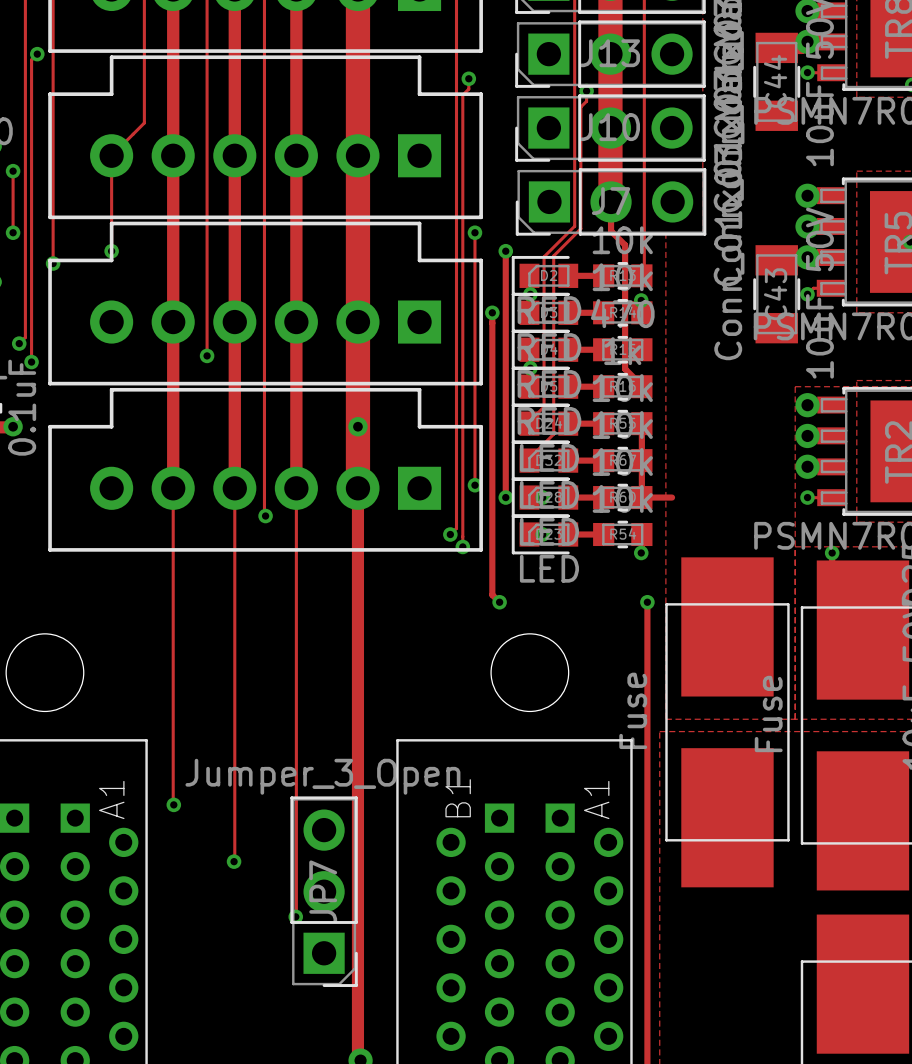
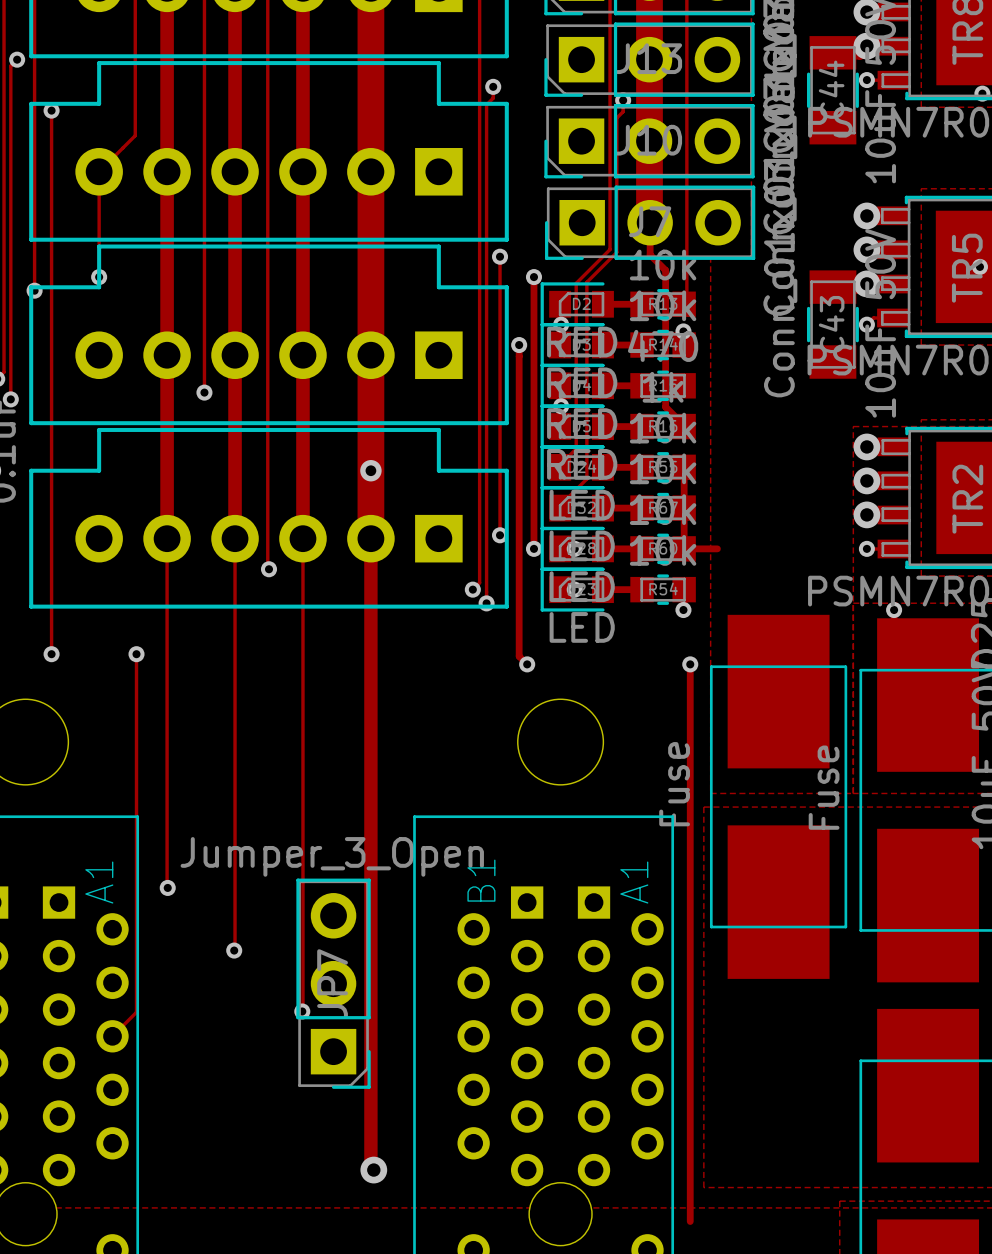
track: none -> (51, 110) (51, 654)
via: none -> (51, 110)
via: none -> (51, 654)
track: none -> (136, 654) (136, 1012) (112, 1036)
via: none -> (136, 654)

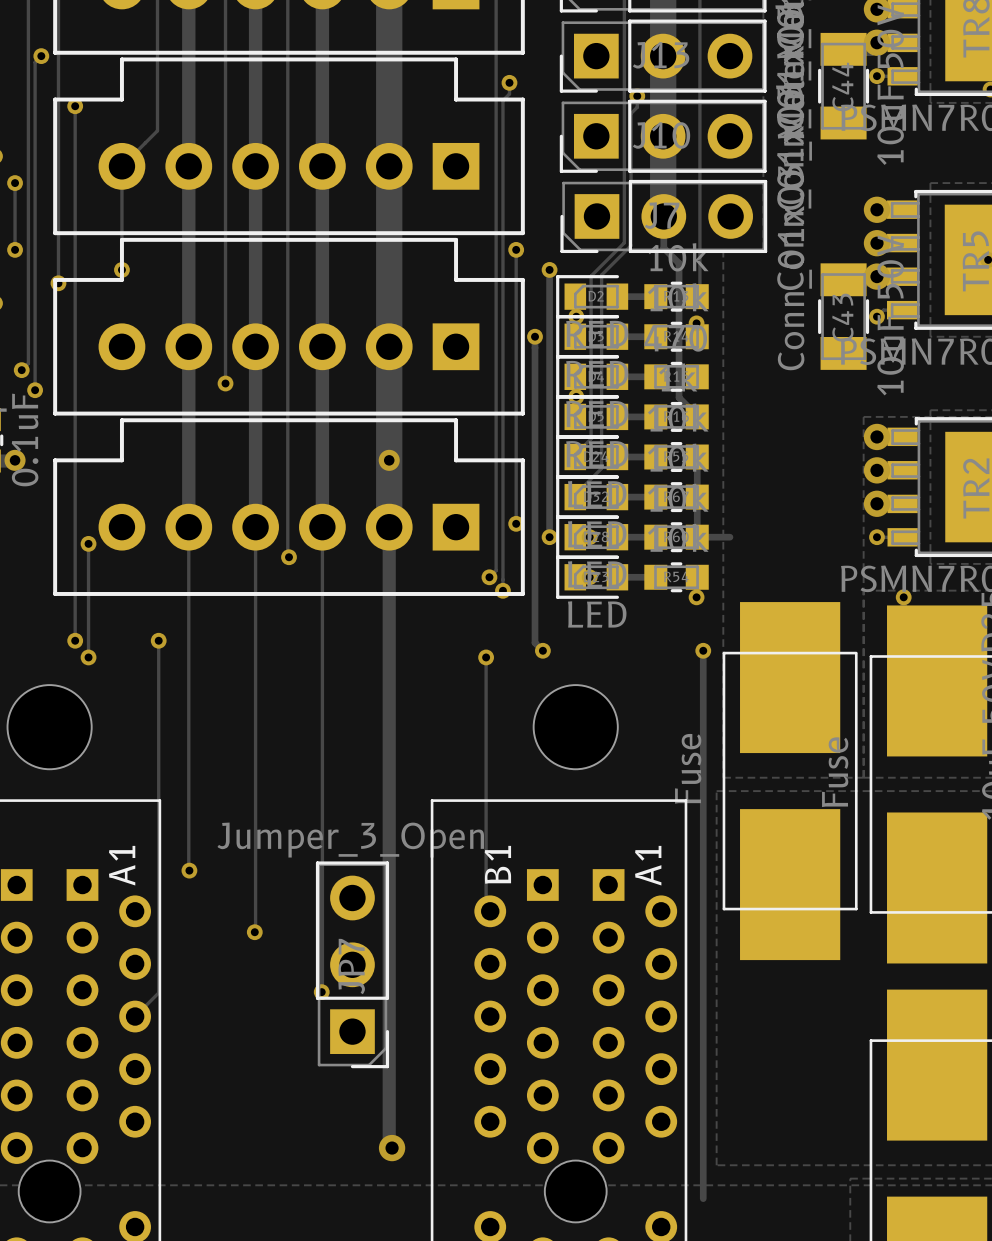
track: none -> (88, 543) (88, 657)
via: none -> (88, 543)
via: none -> (88, 657)
track: none -> (486, 657) (486, 907) (490, 911)
via: none -> (486, 657)

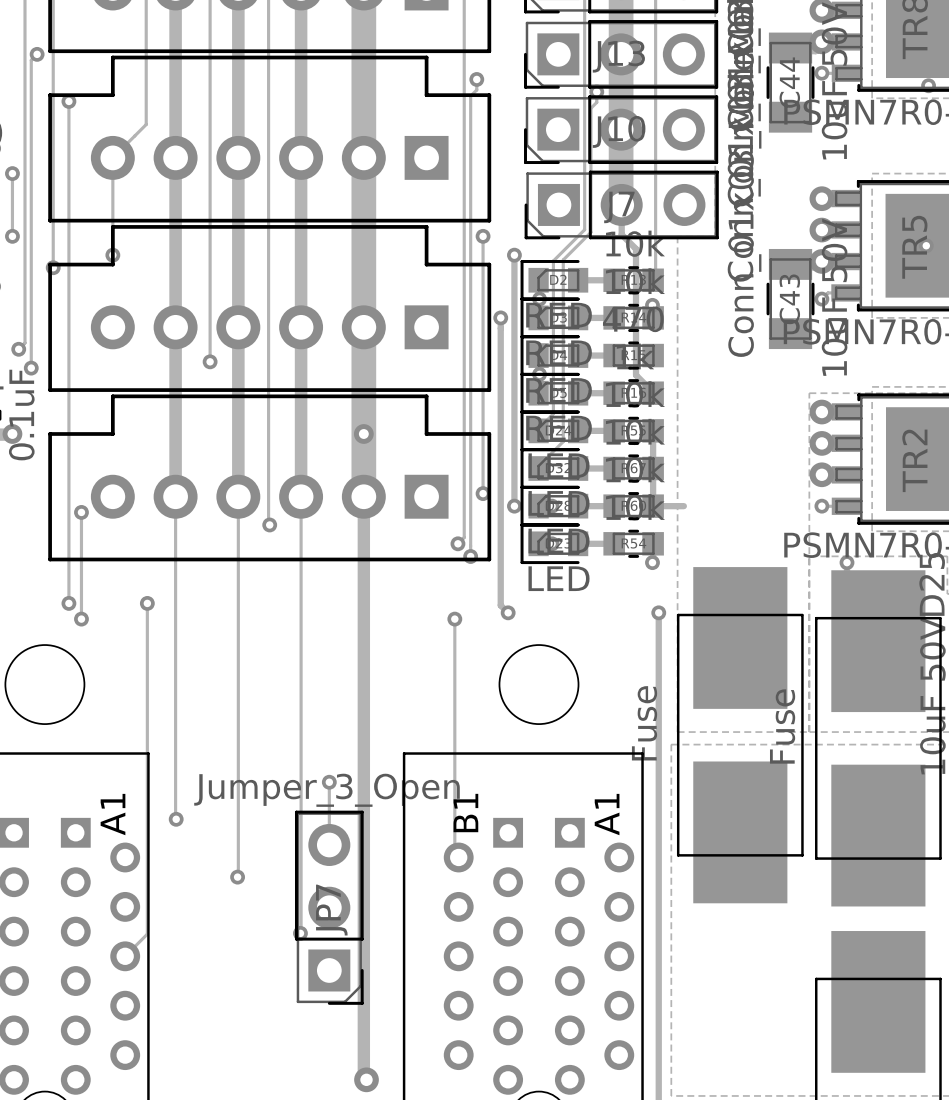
track: none -> (329, 782) (329, 844)
via: none -> (329, 782)

